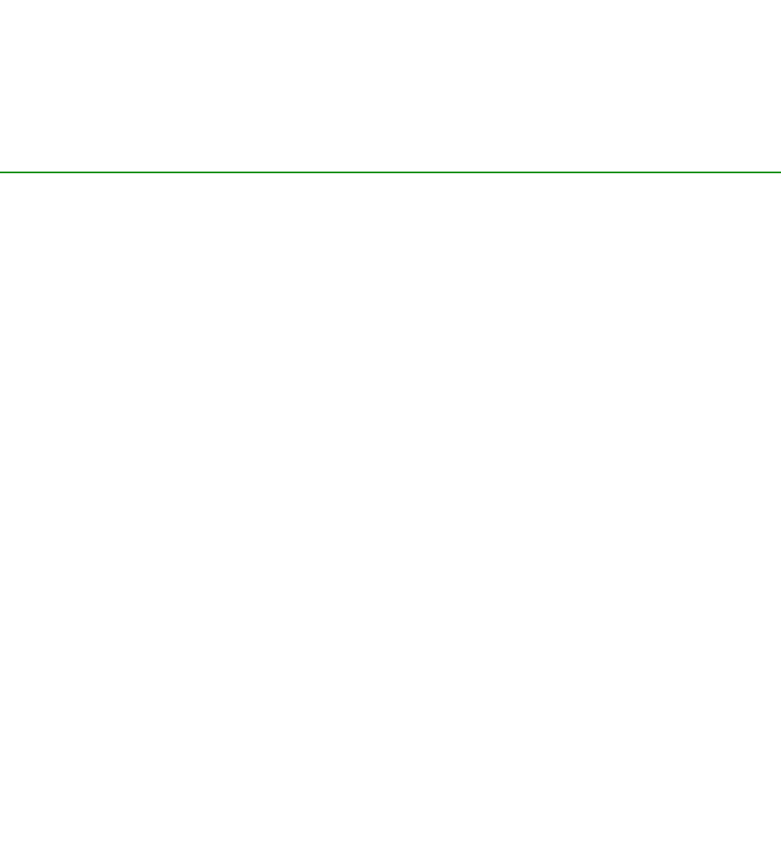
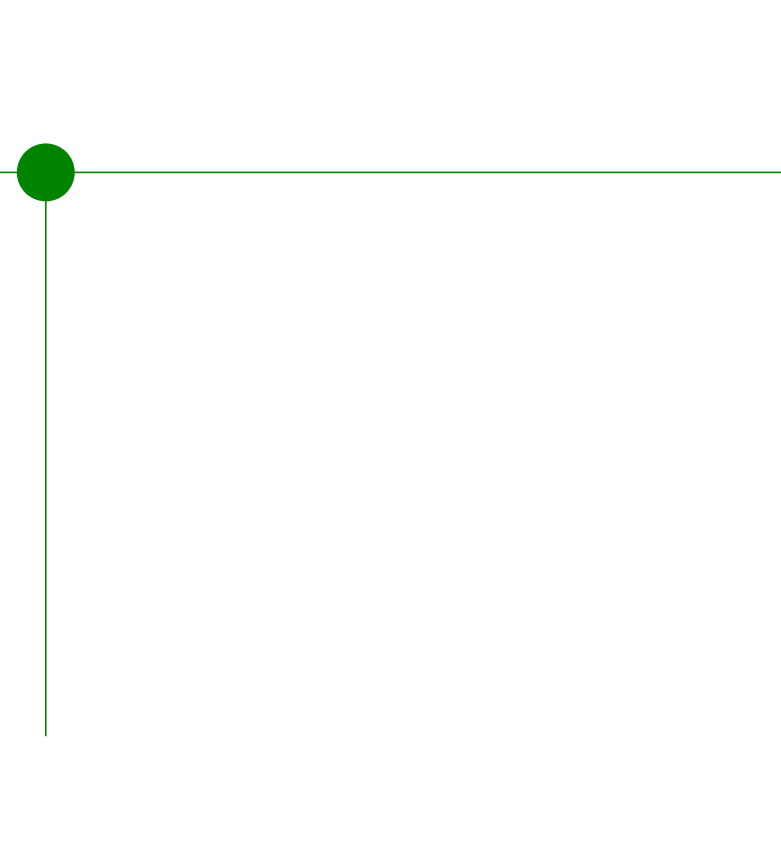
wire: none -> (45, 172) (45, 735)
junction: none -> (45, 172)

